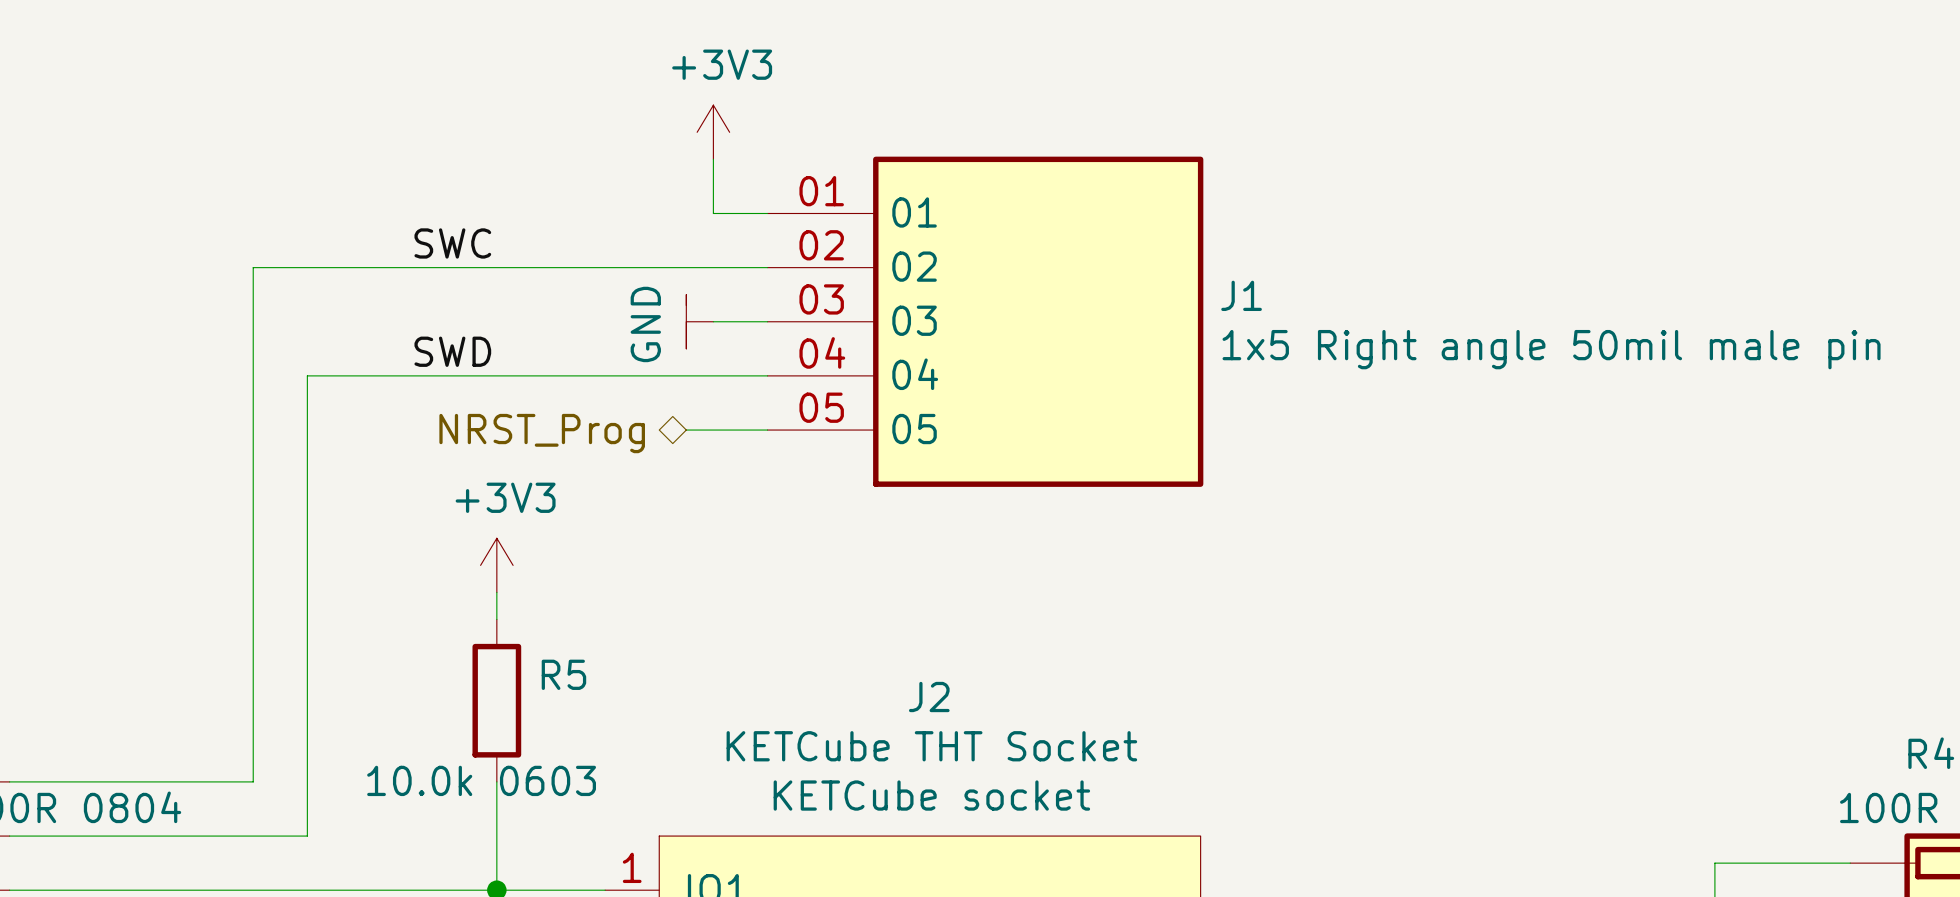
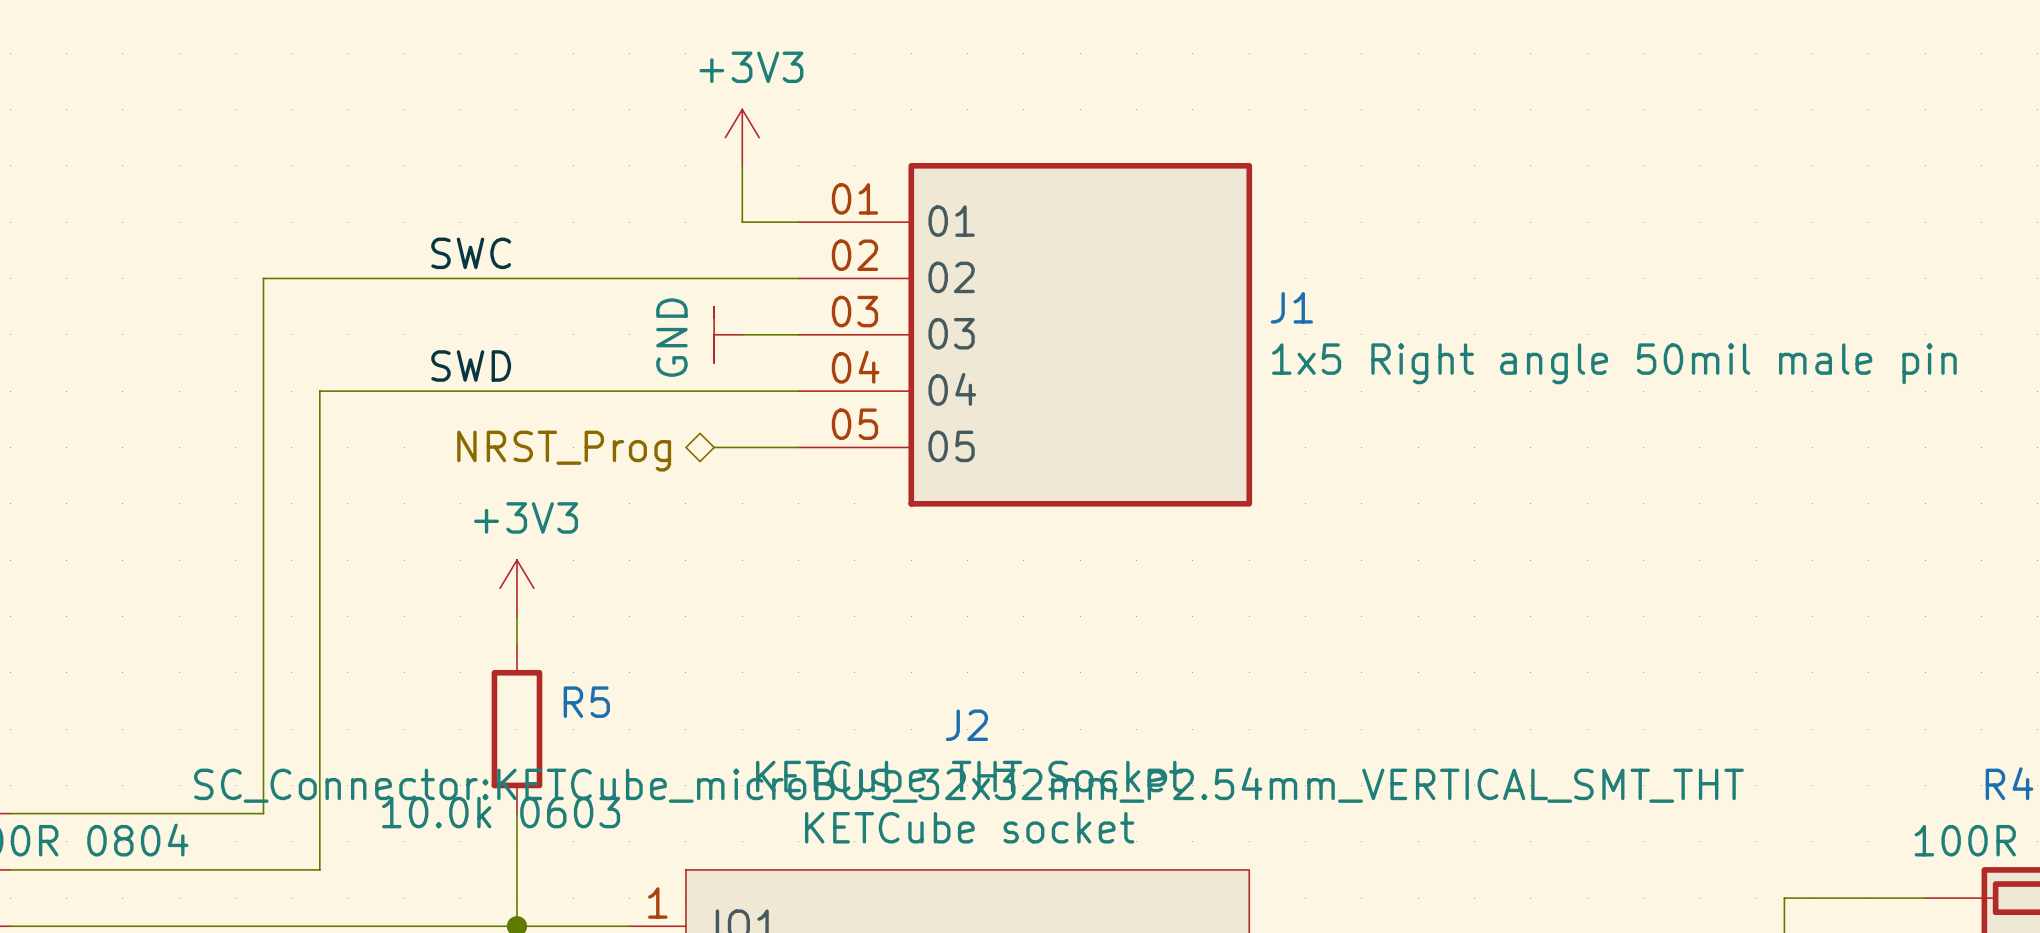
J2 text: none -> SC_Connector:KETCube_microBUS_32x32mm_P2.54mm_VERTICAL_SMT_THT (968, 785)

